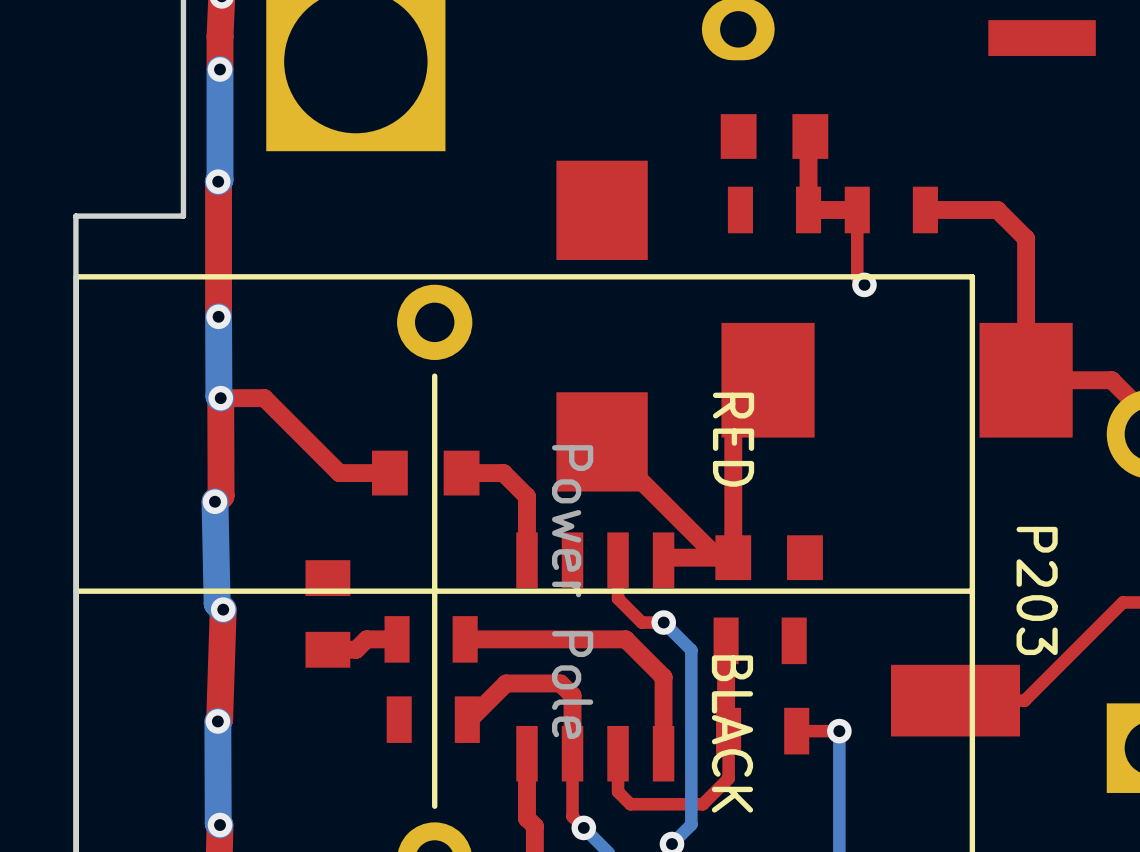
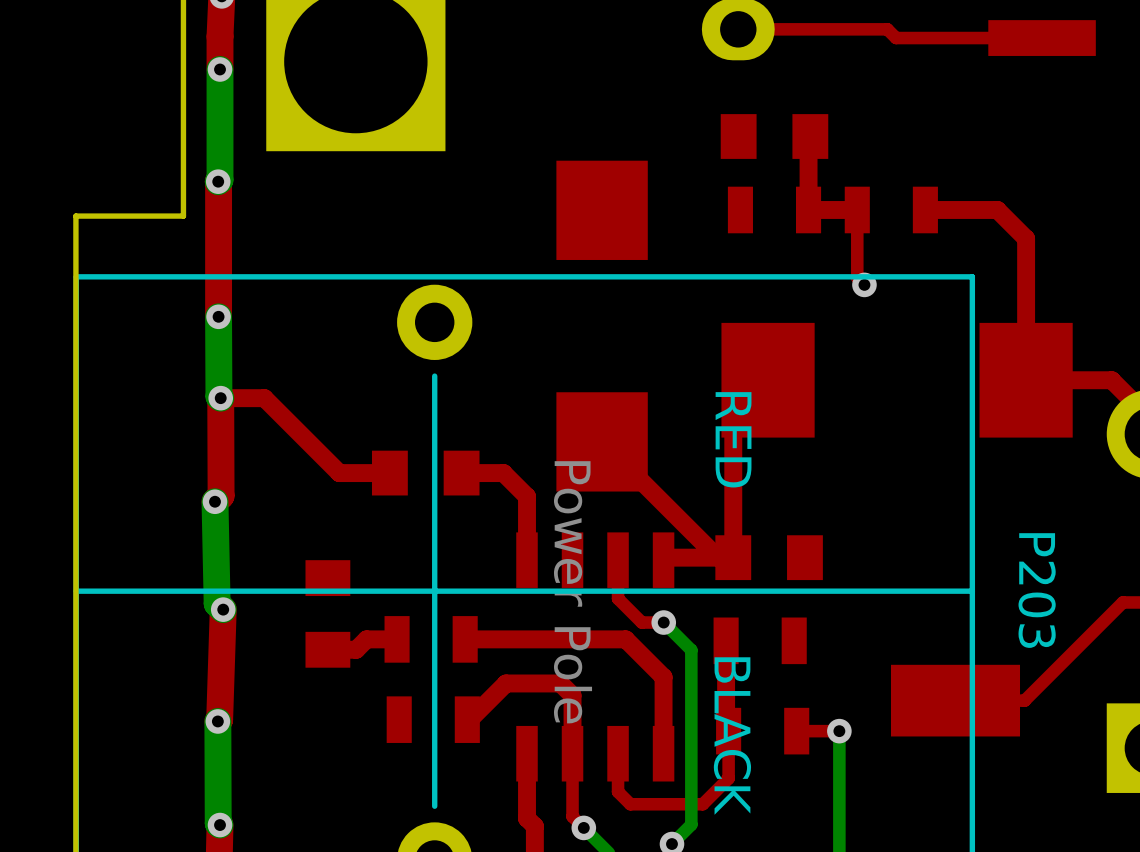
top track: none -> (738, 29) (887, 29) (896, 38) (1042, 38)

